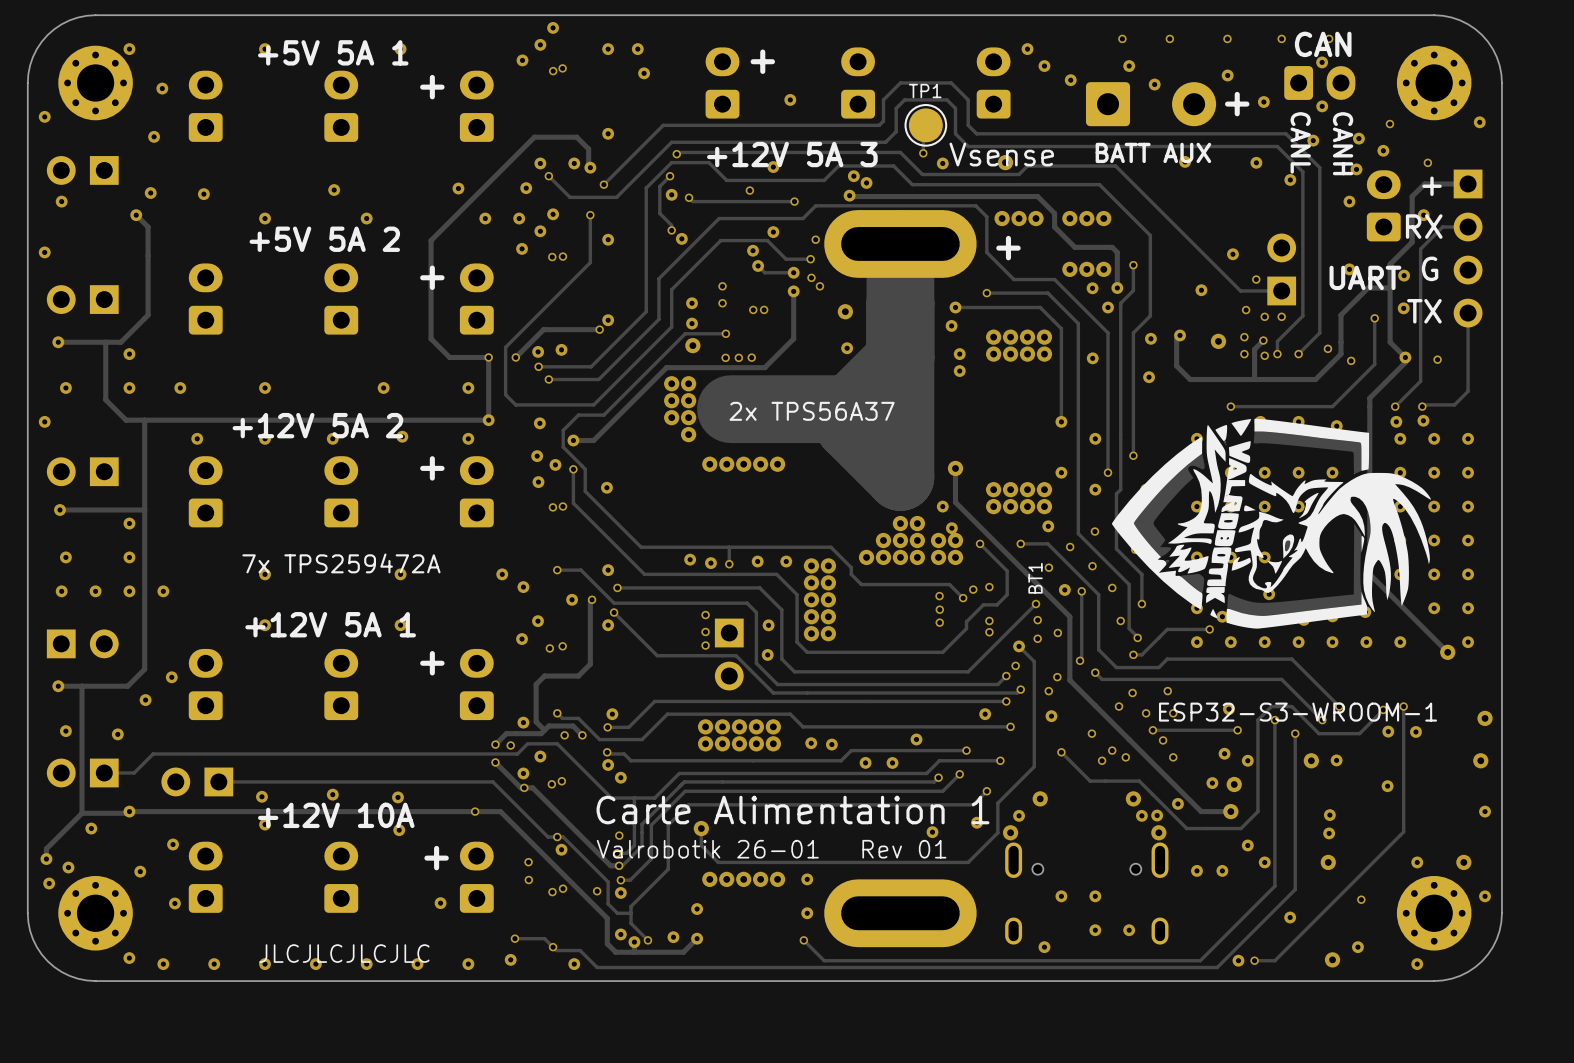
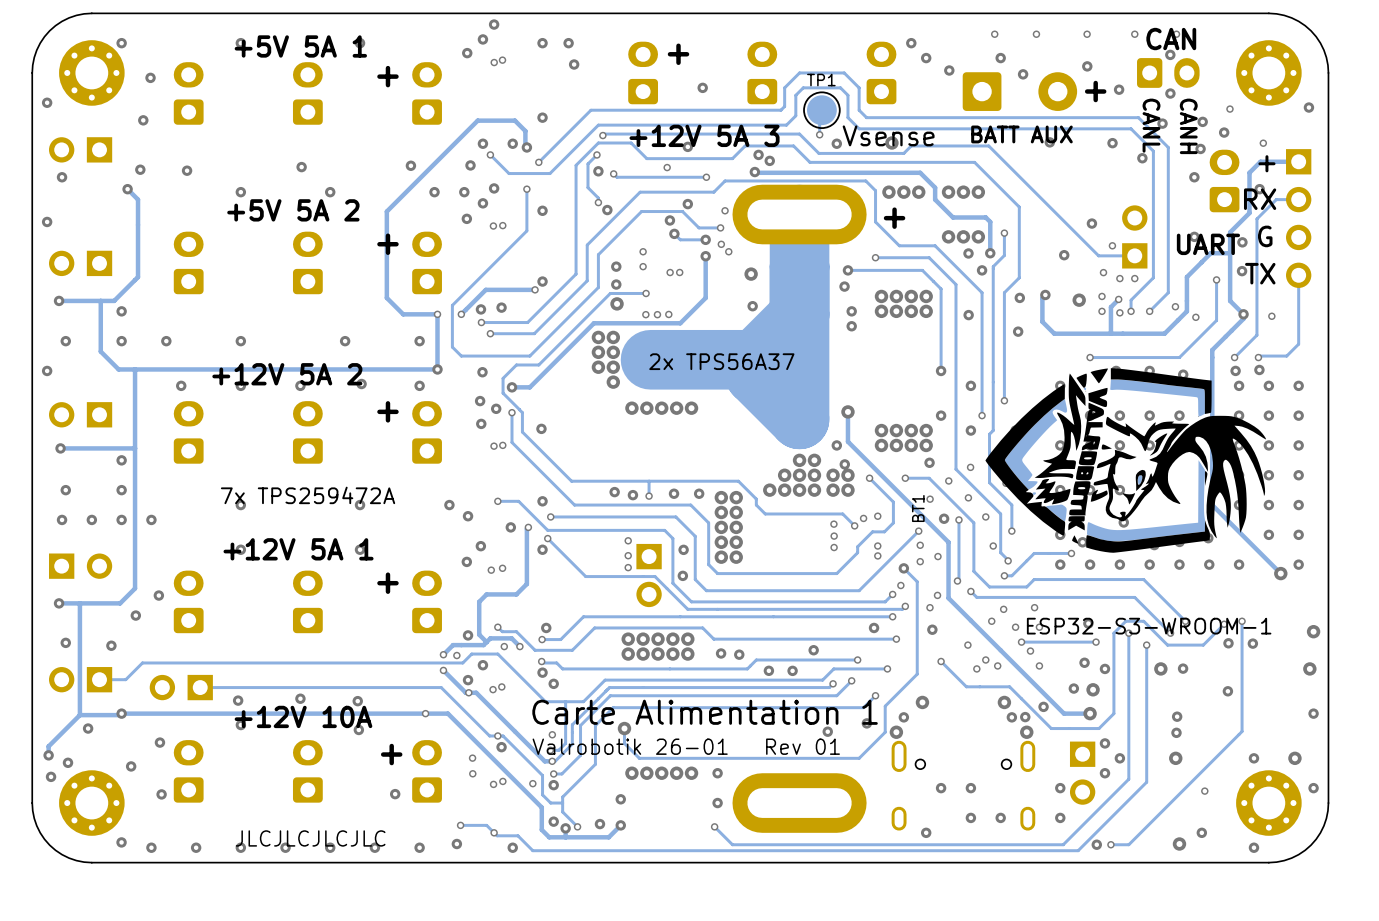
via: (1196, 870) -> none
via: (1222, 870) -> none
part: none -> (1082, 773)
via: none -> (1104, 773)
via: none -> (1060, 788)
via: (1290, 917) -> none
via: none -> (1060, 817)

